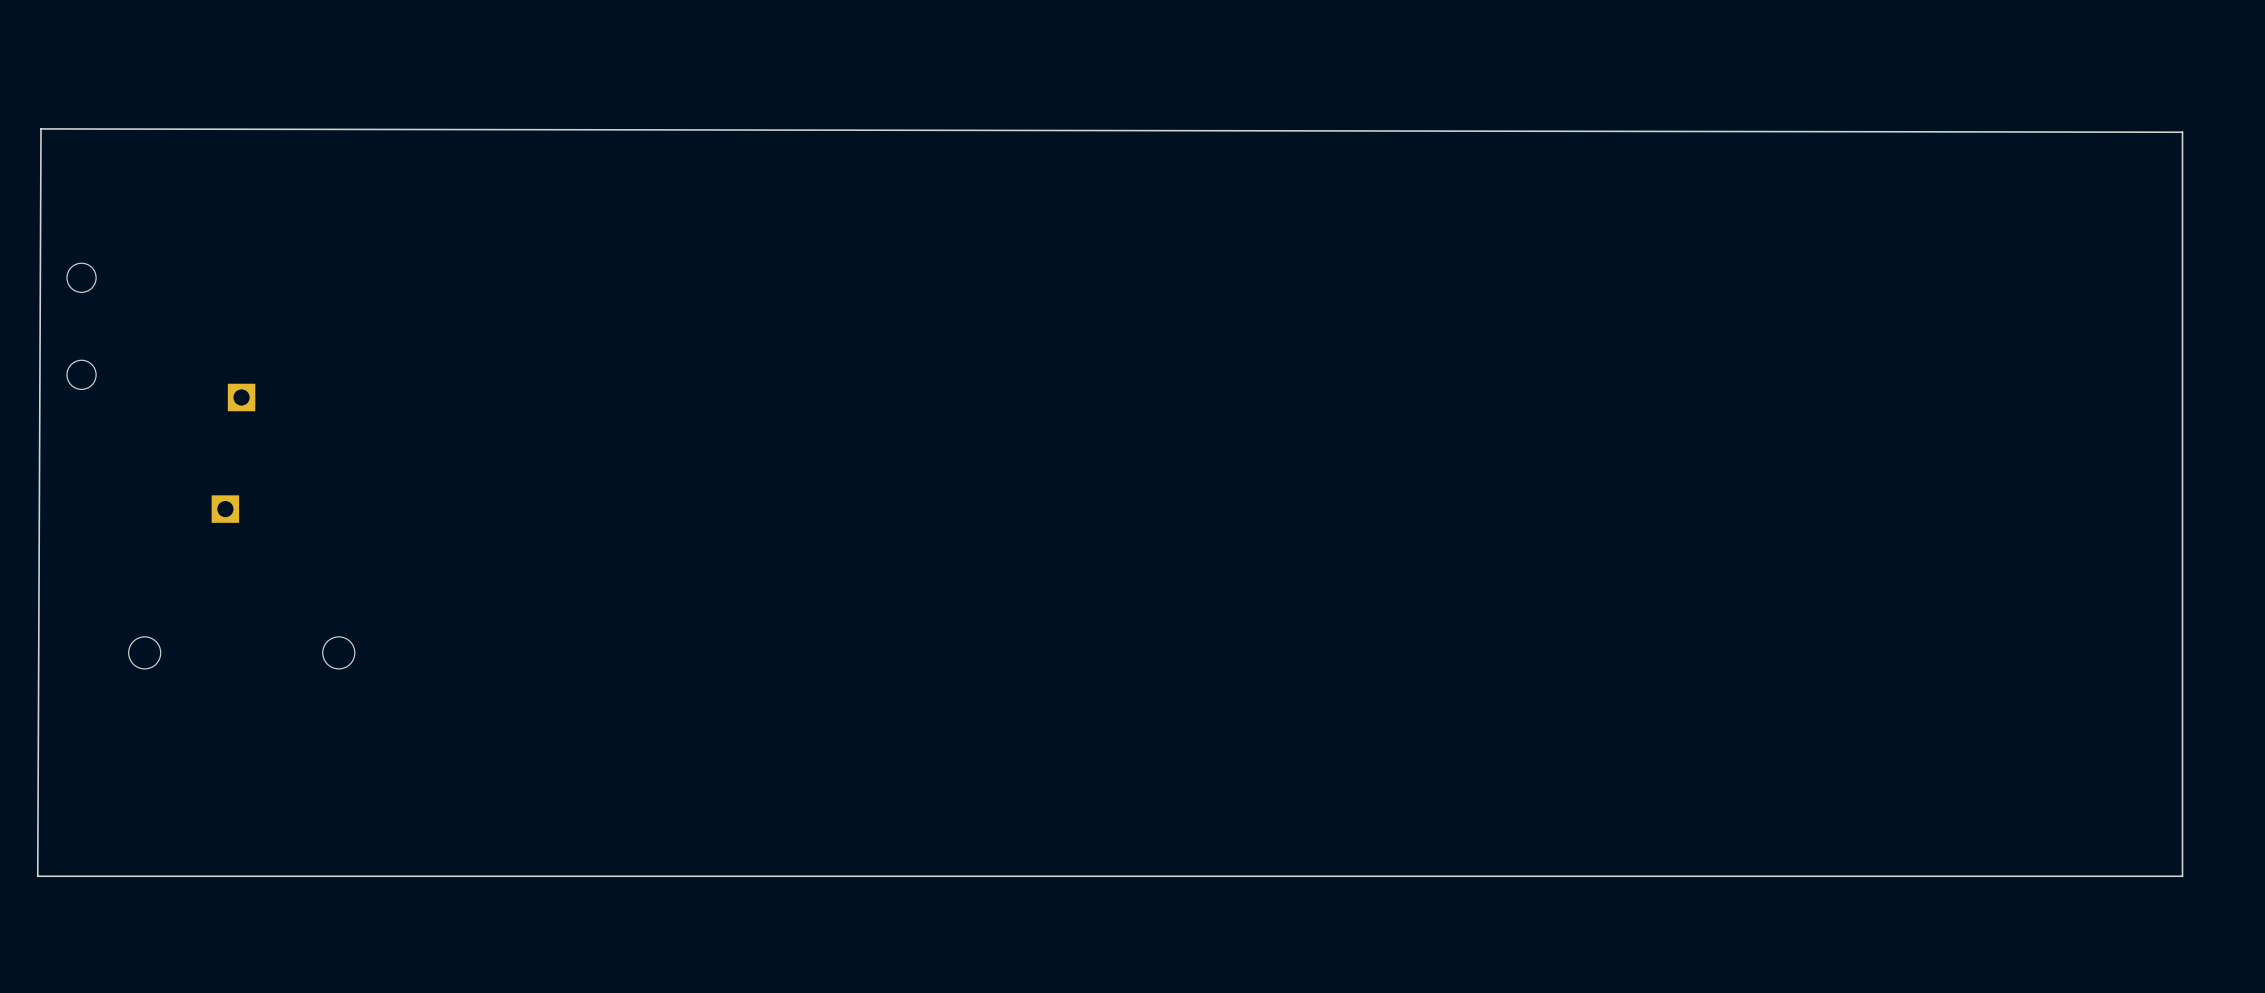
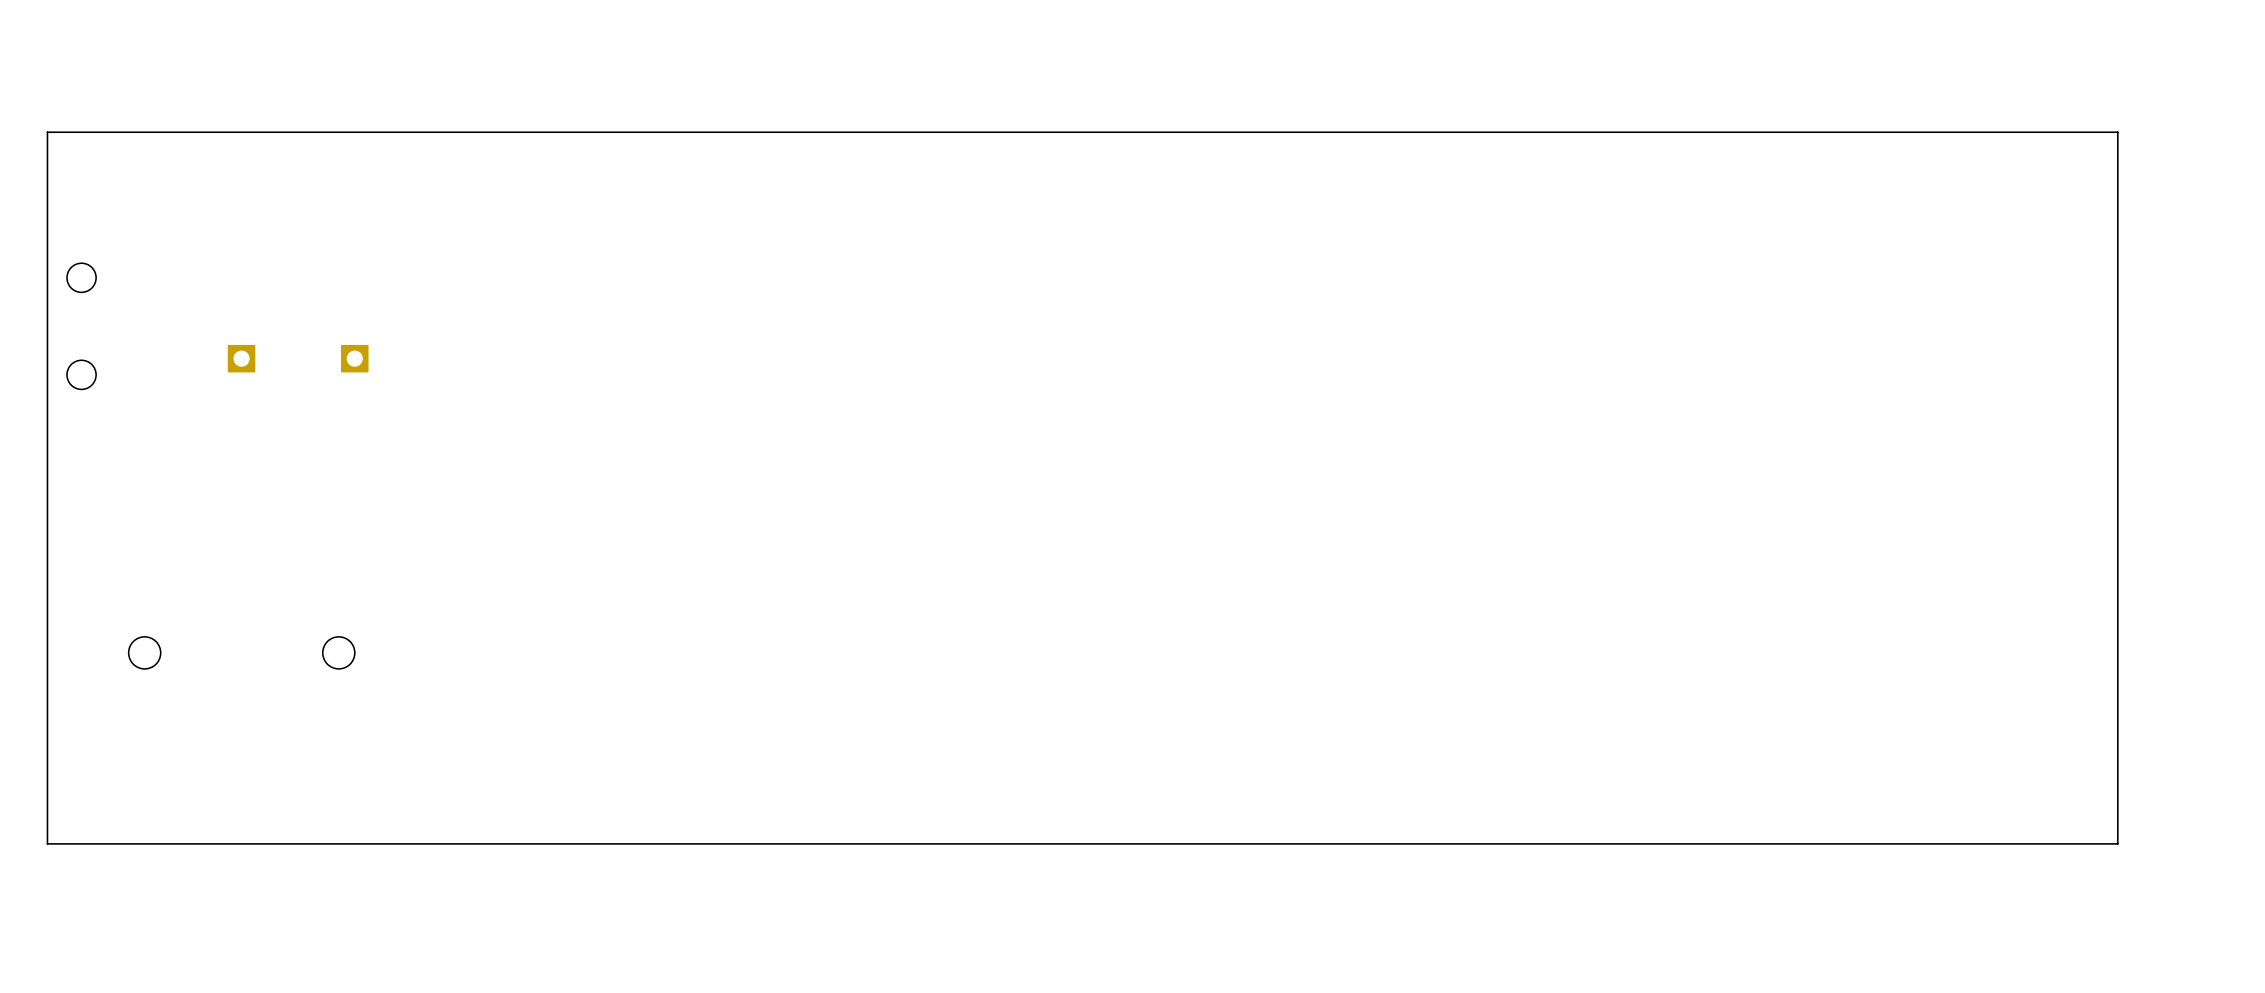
board edge: (41, 128) (37, 876) (2182, 876) (2182, 132) (41, 128) -> (2117, 132) (2117, 843) (47, 843) (47, 132) (2117, 132)
part: none -> (354, 358)
part position: (241, 397) -> (241, 358)
part: (225, 509) -> none

